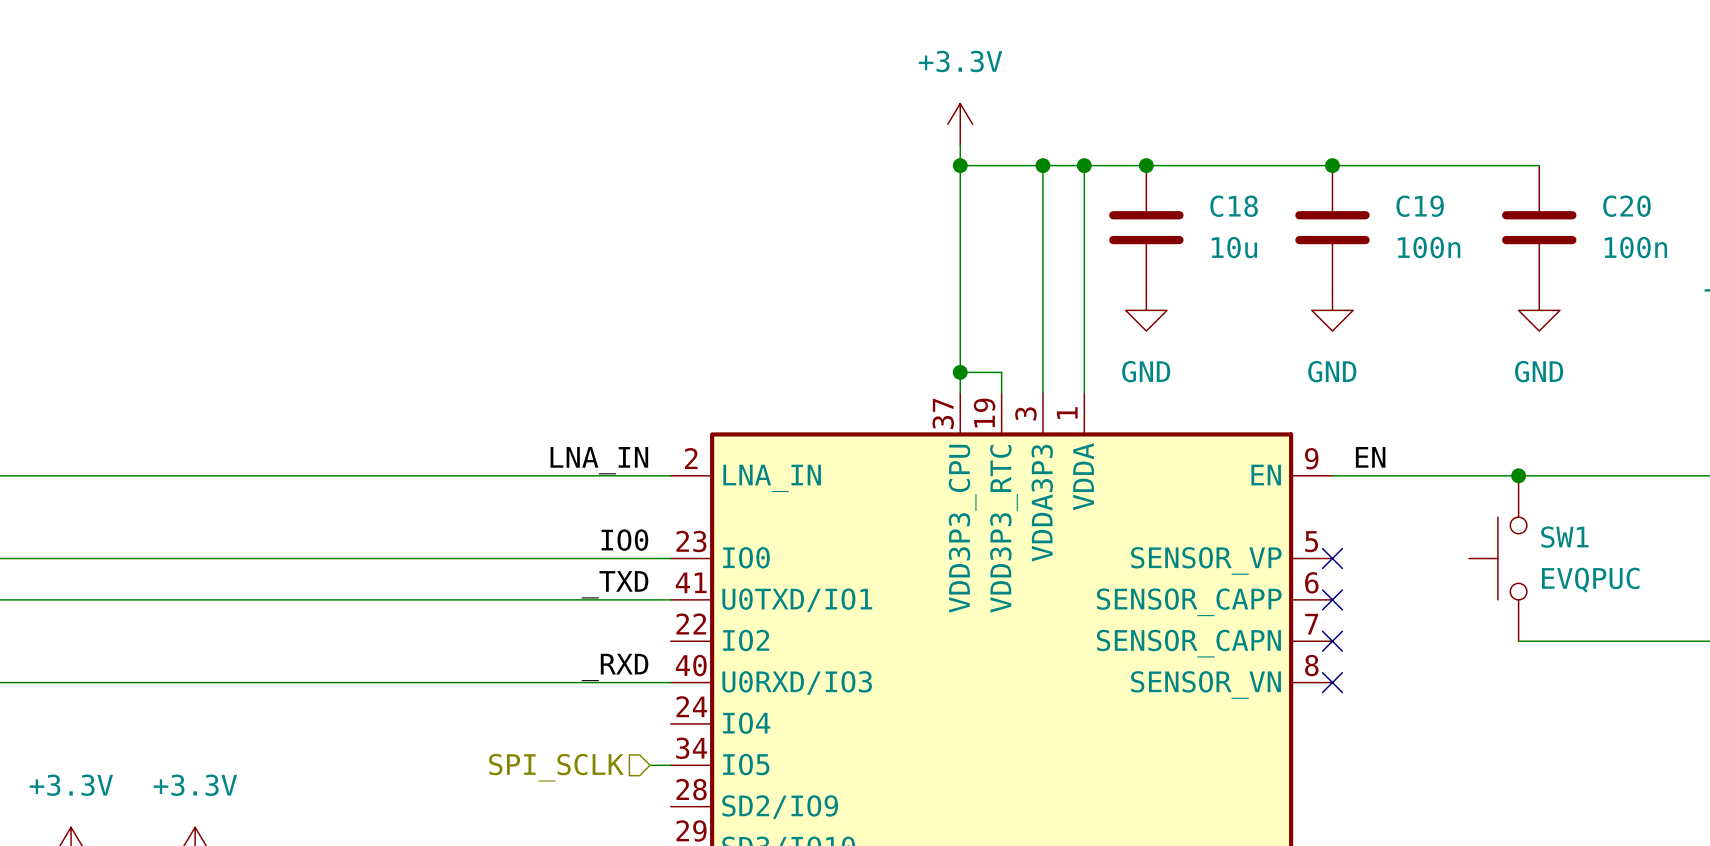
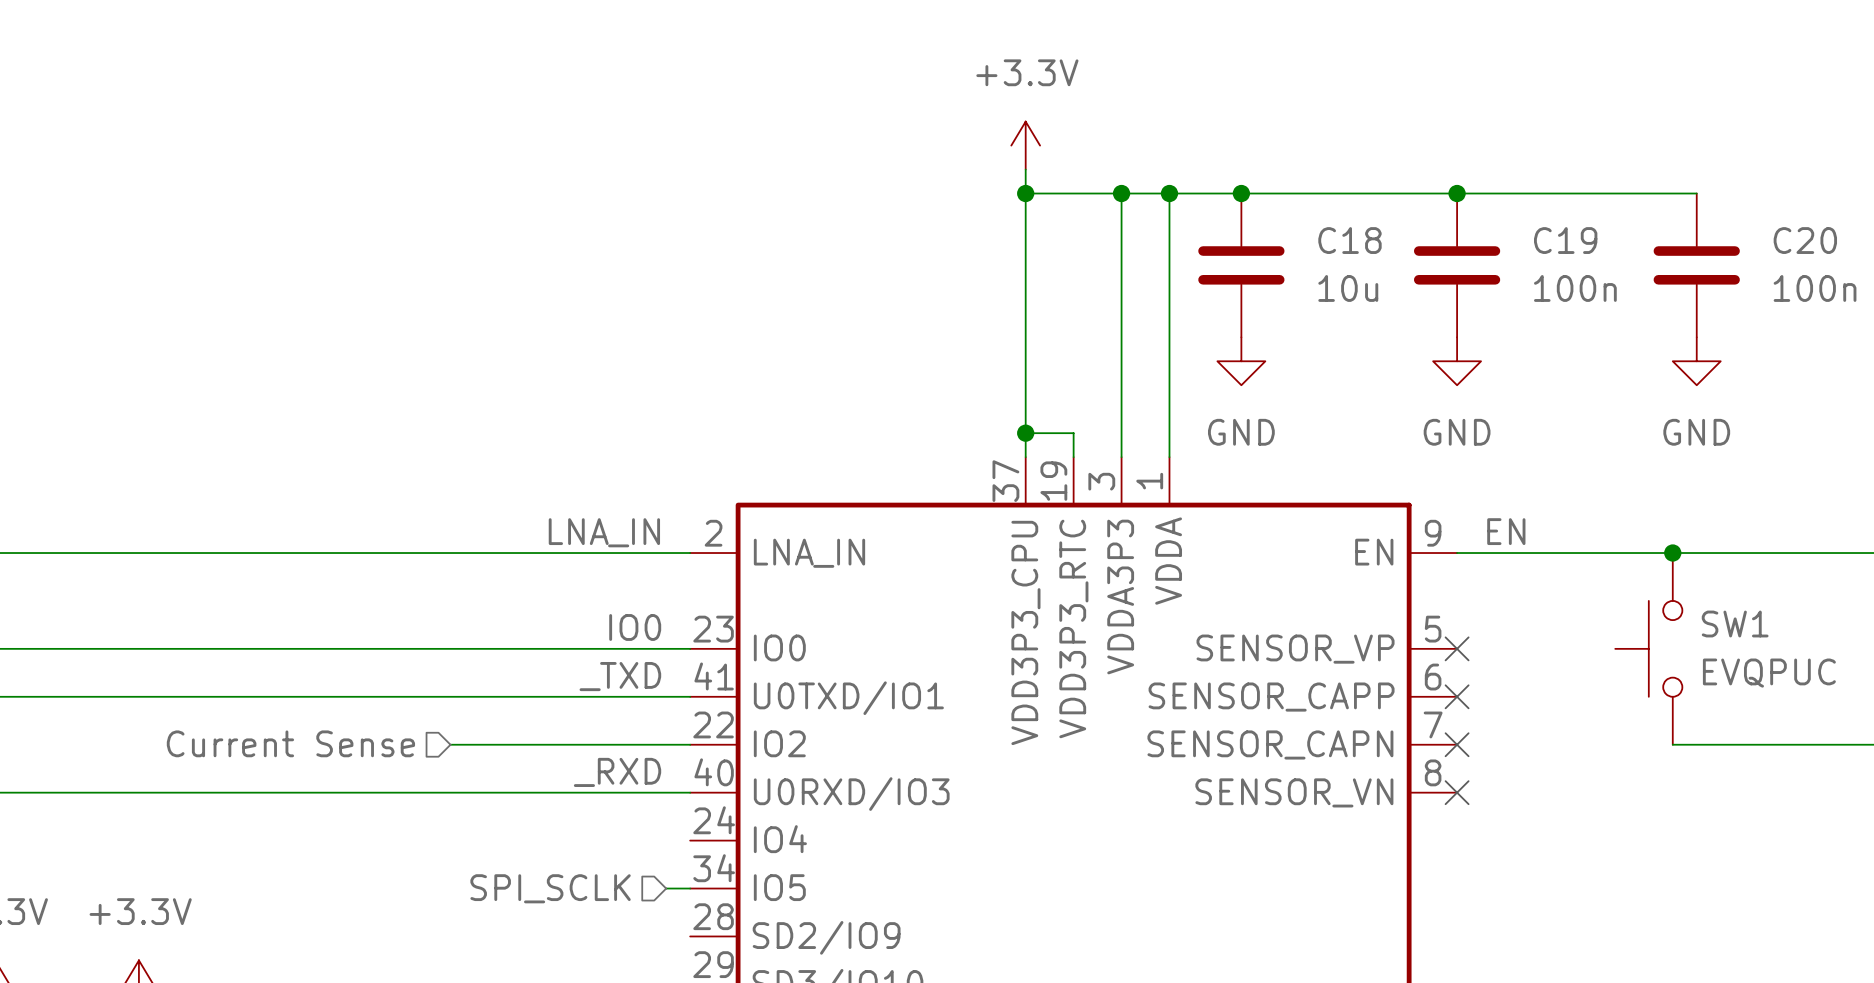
hierarchical label: none -> Current Sense (290, 743)
wire: none -> (450, 744) (690, 744)

